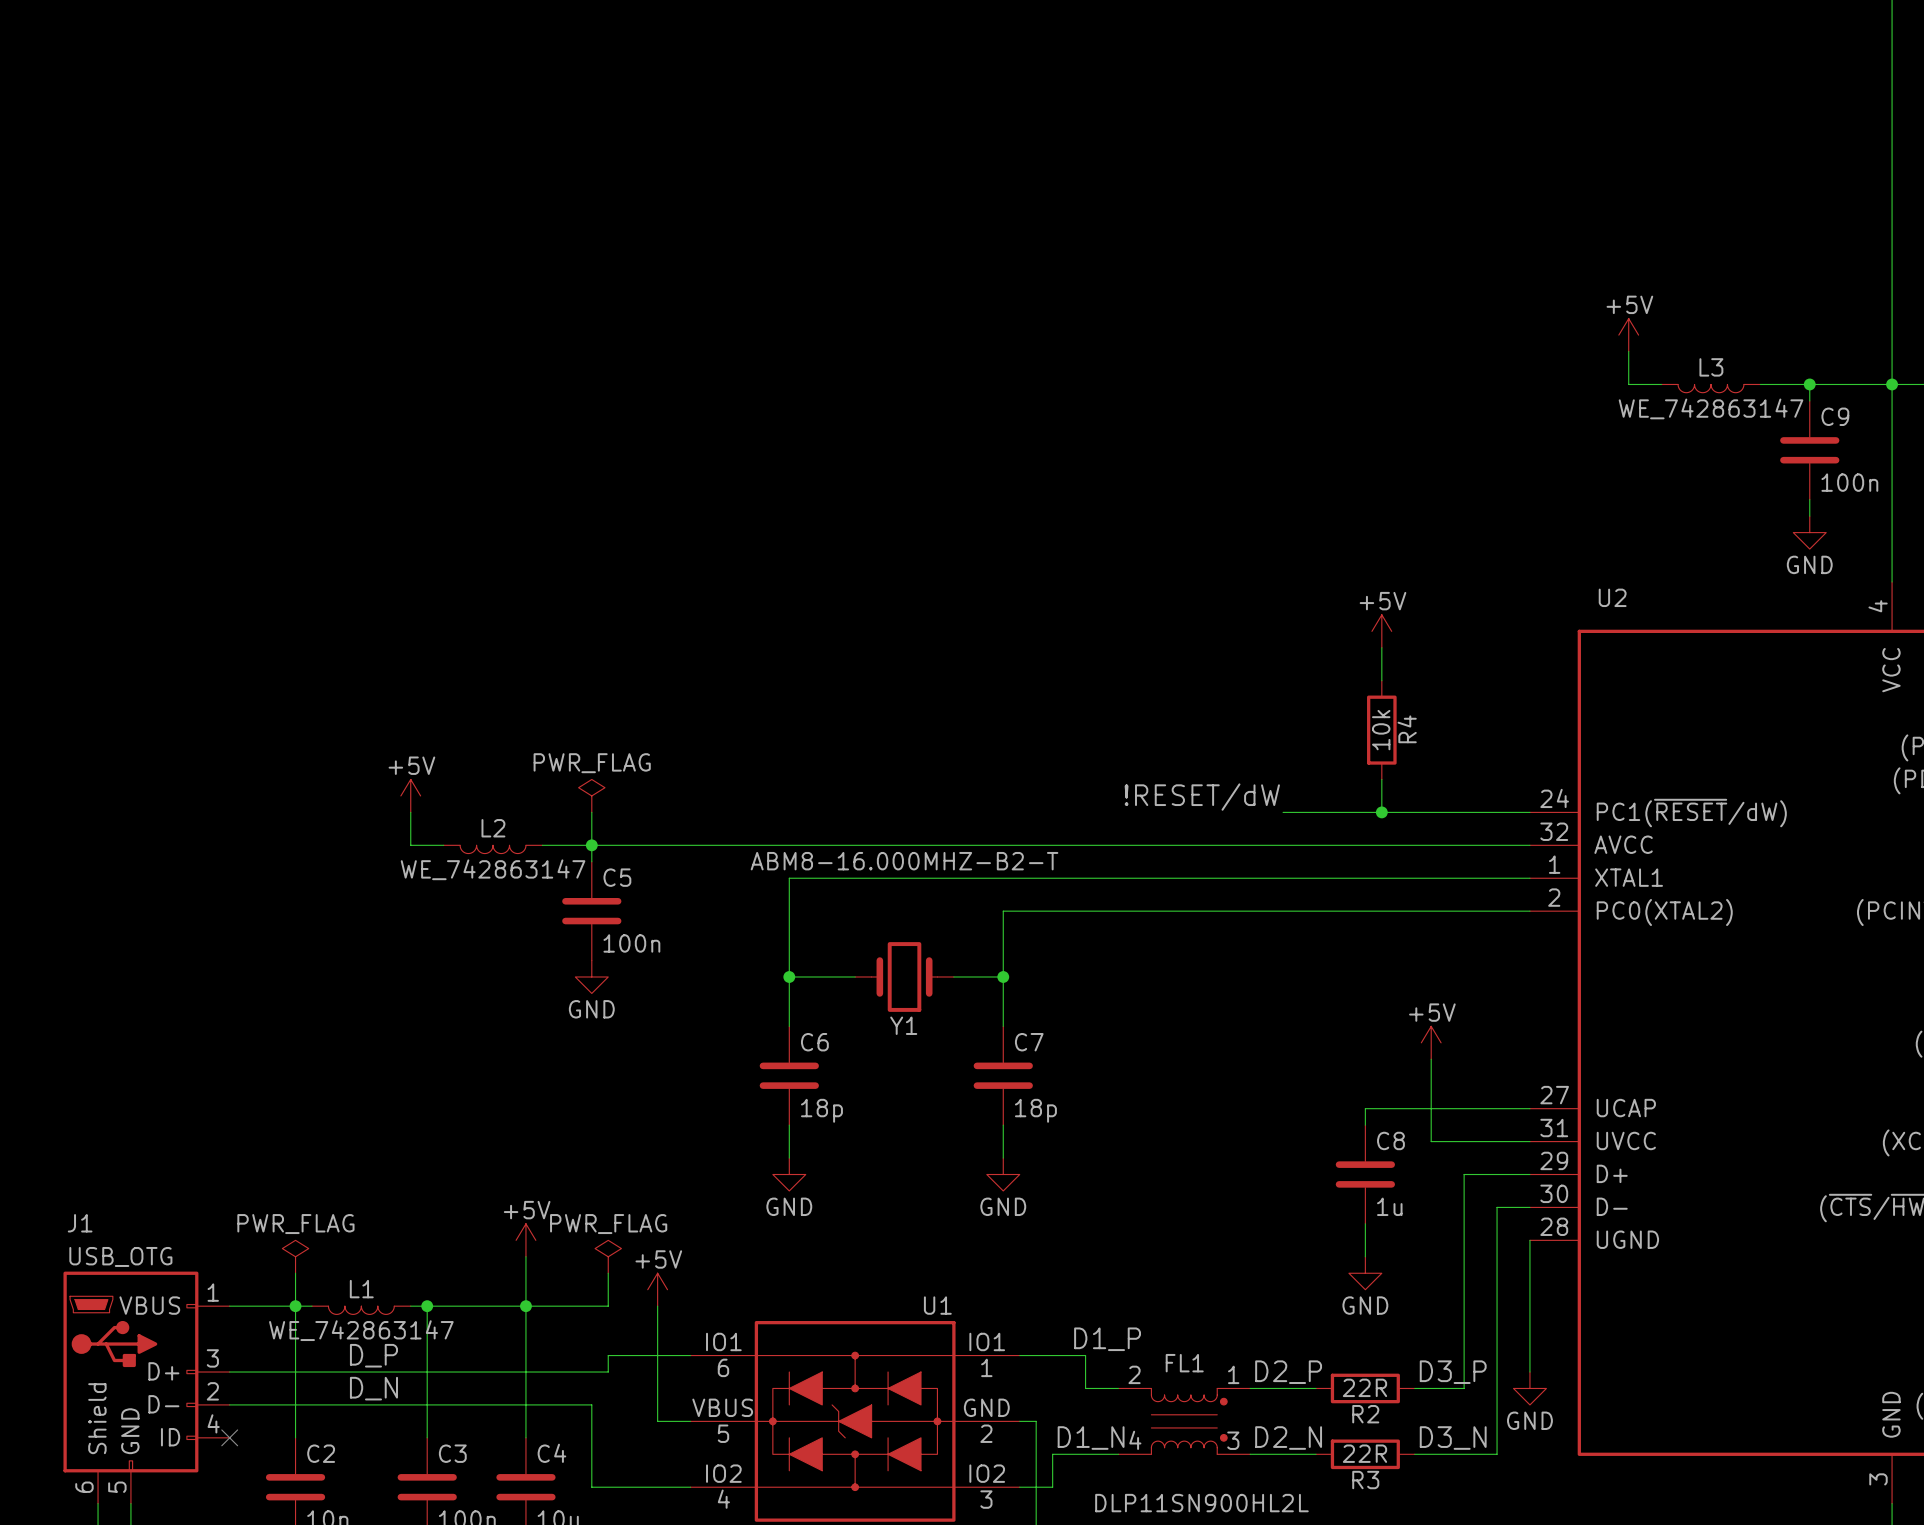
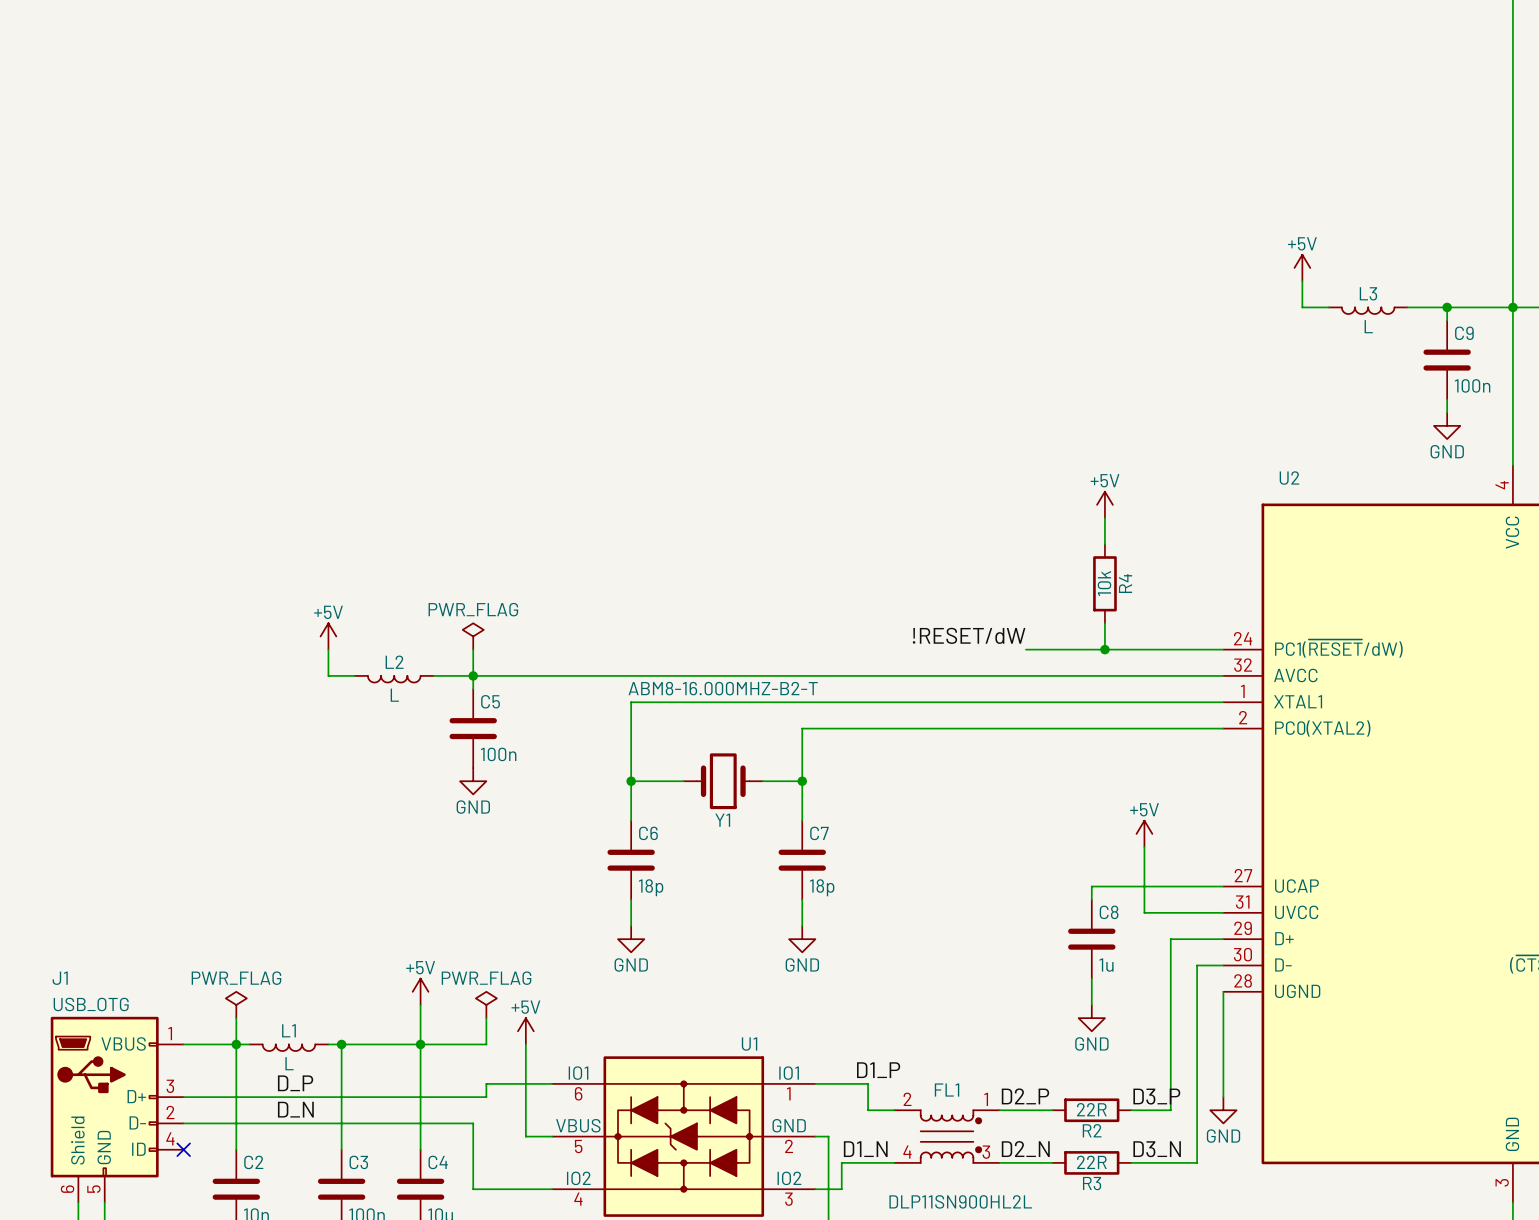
L3 value: WE_742863147 (1711, 408) -> L (1368, 326)
L2 value: WE_742863147 (493, 869) -> L (394, 695)
L1 value: WE_742863147 (361, 1330) -> L (289, 1063)

